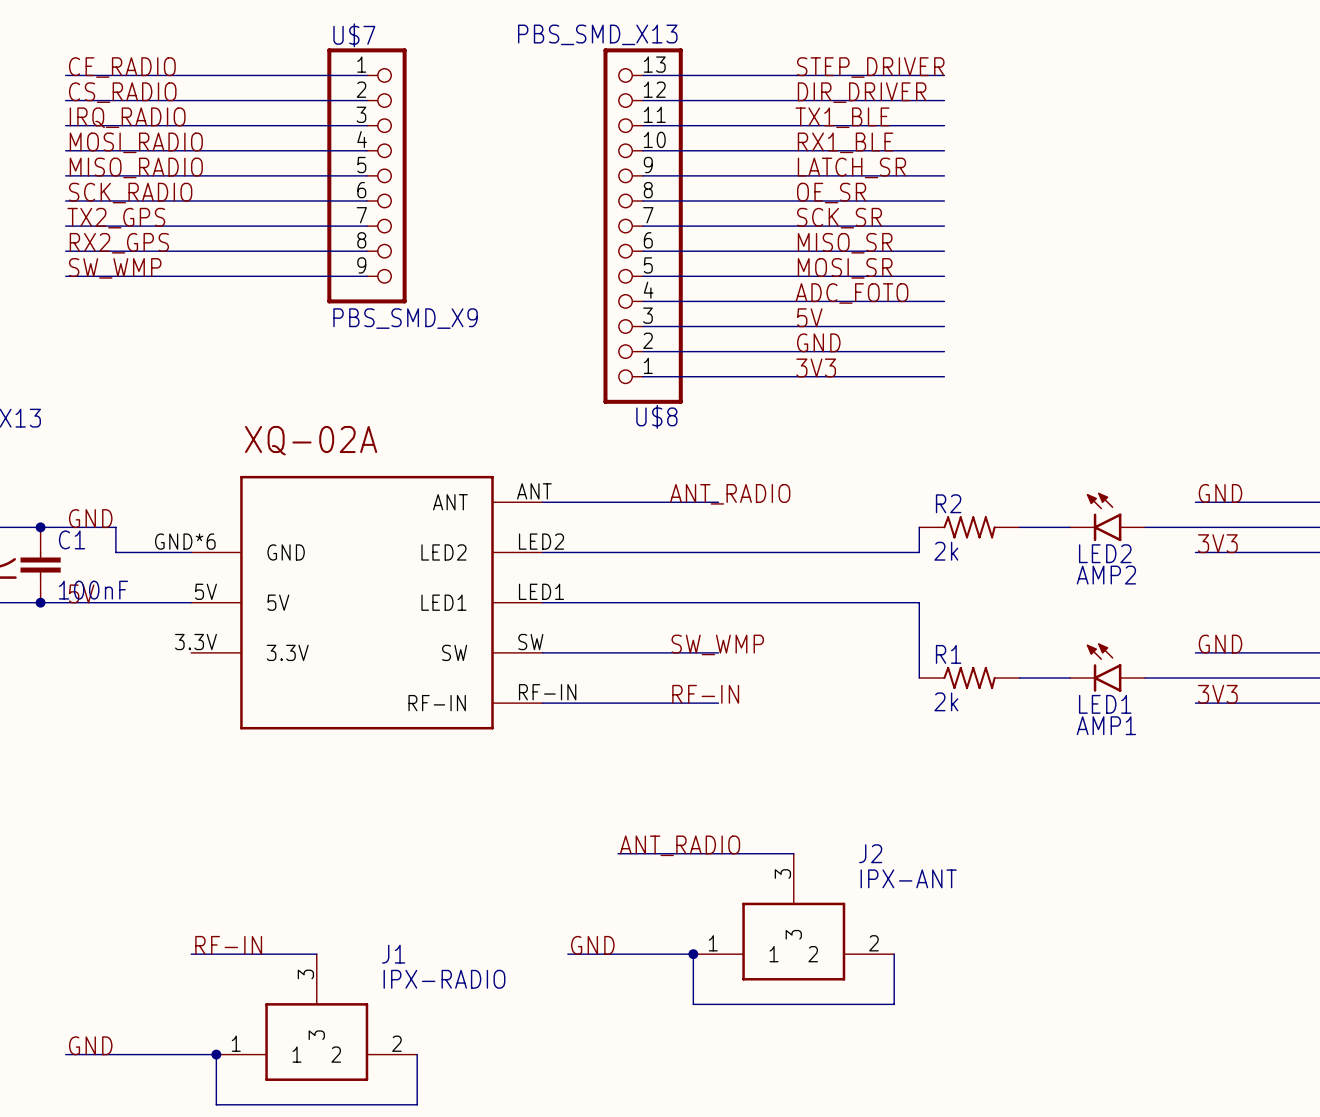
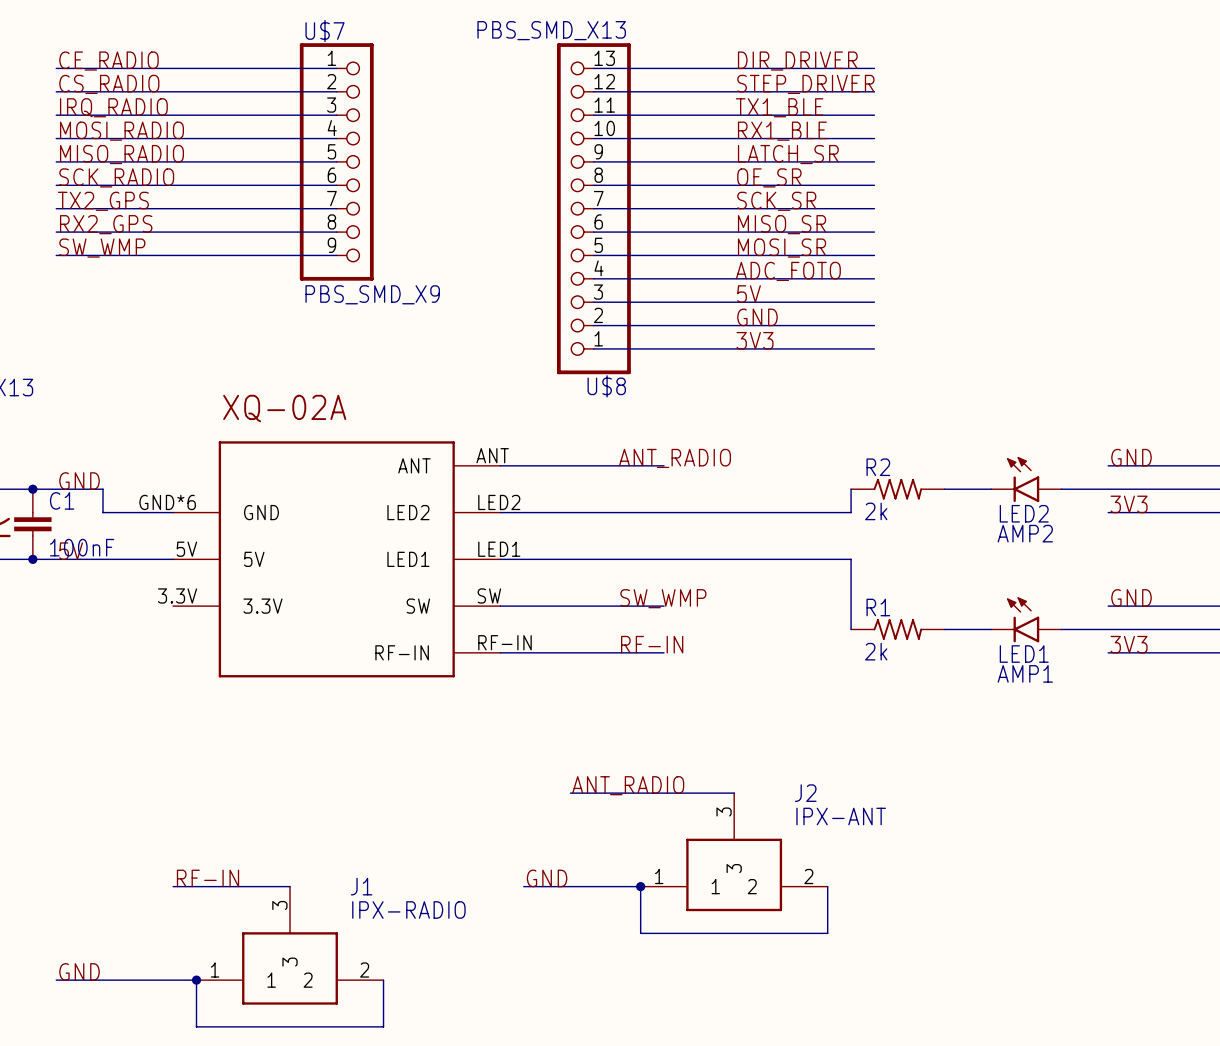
label: STEP_DRIVER (870, 67) -> DIR_DRIVER (797, 61)
label: DIR_DRIVER (862, 92) -> STEP_DRIVER (805, 84)

